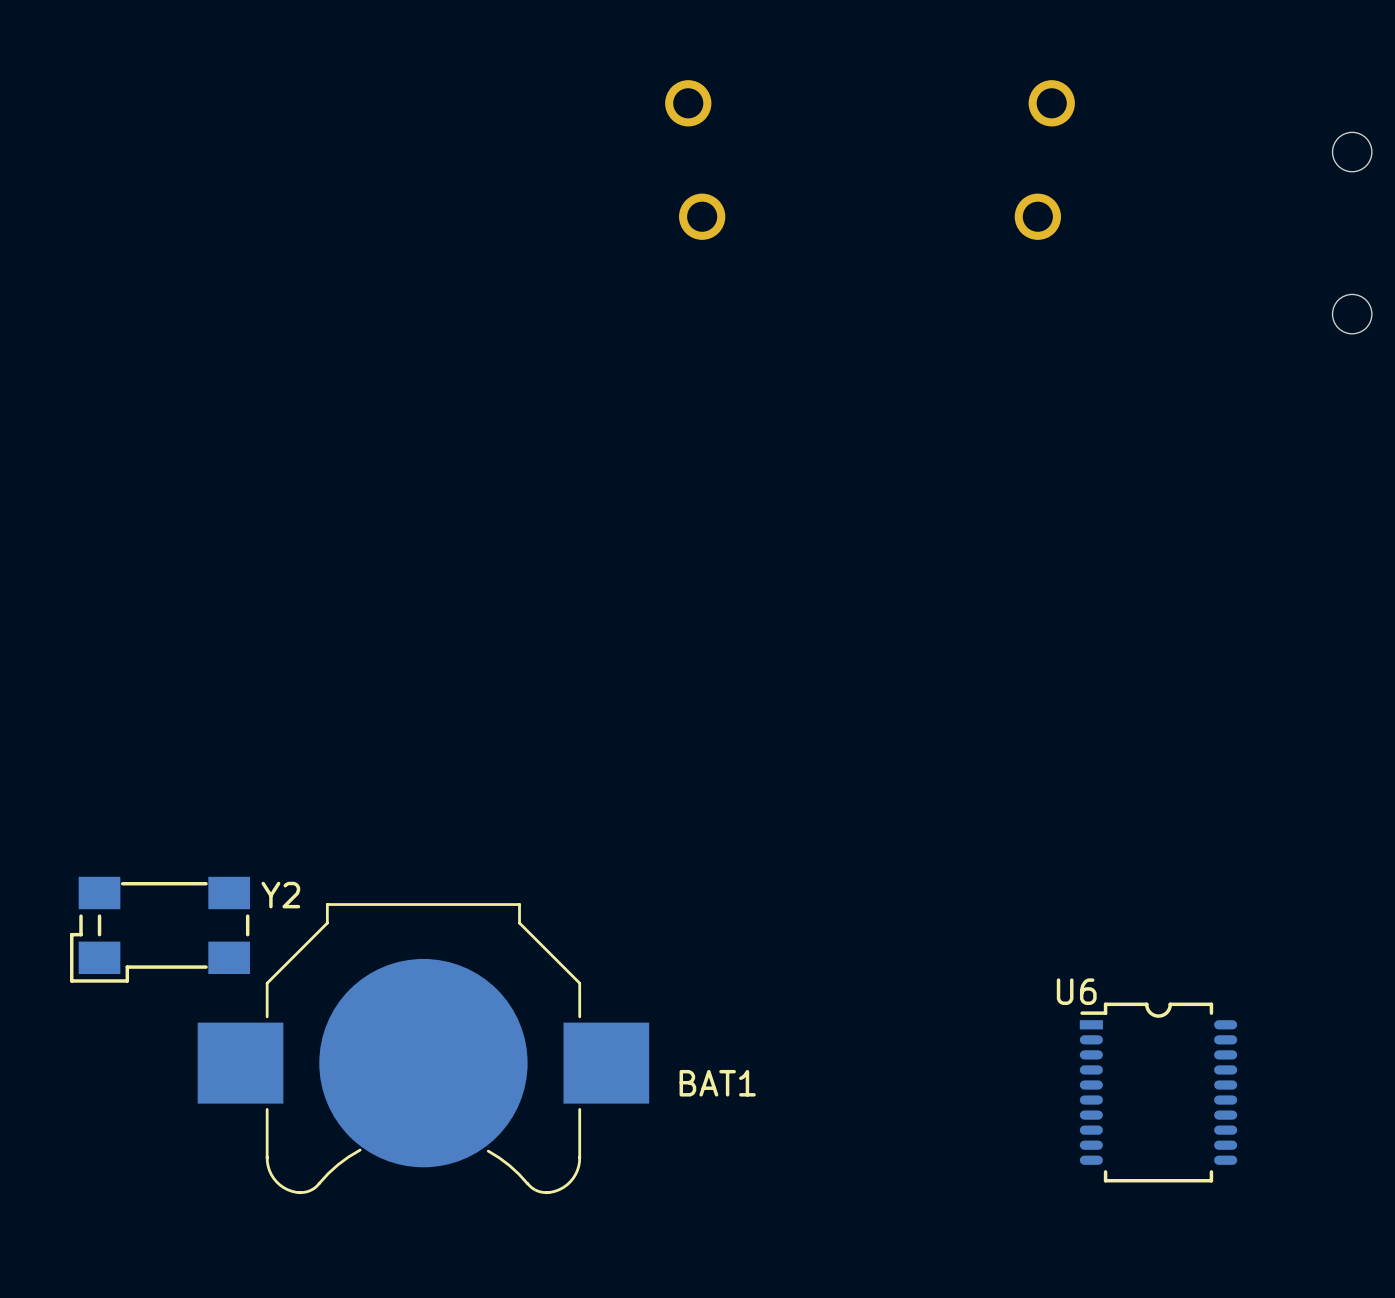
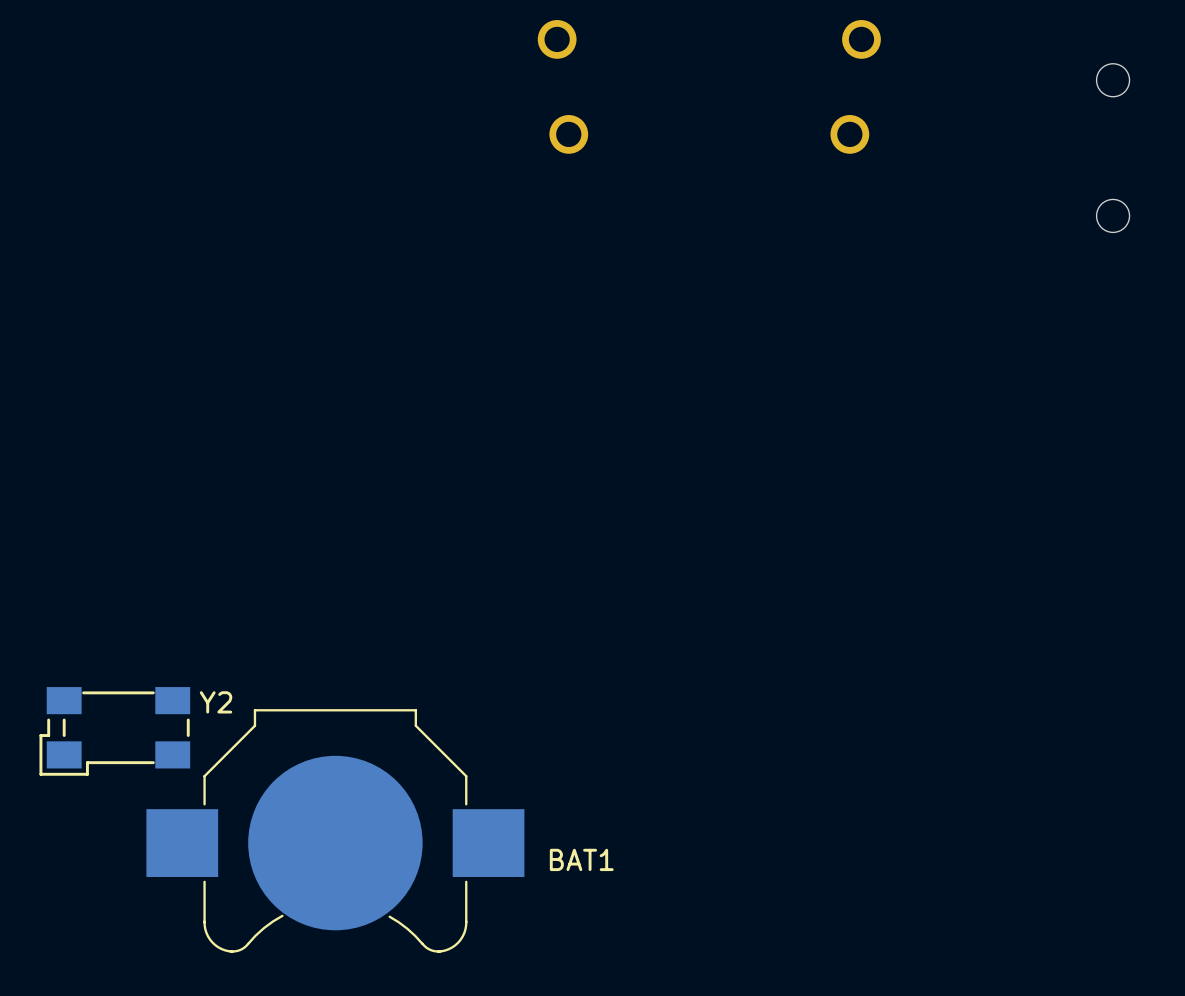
U6: (1158, 1092) -> none

